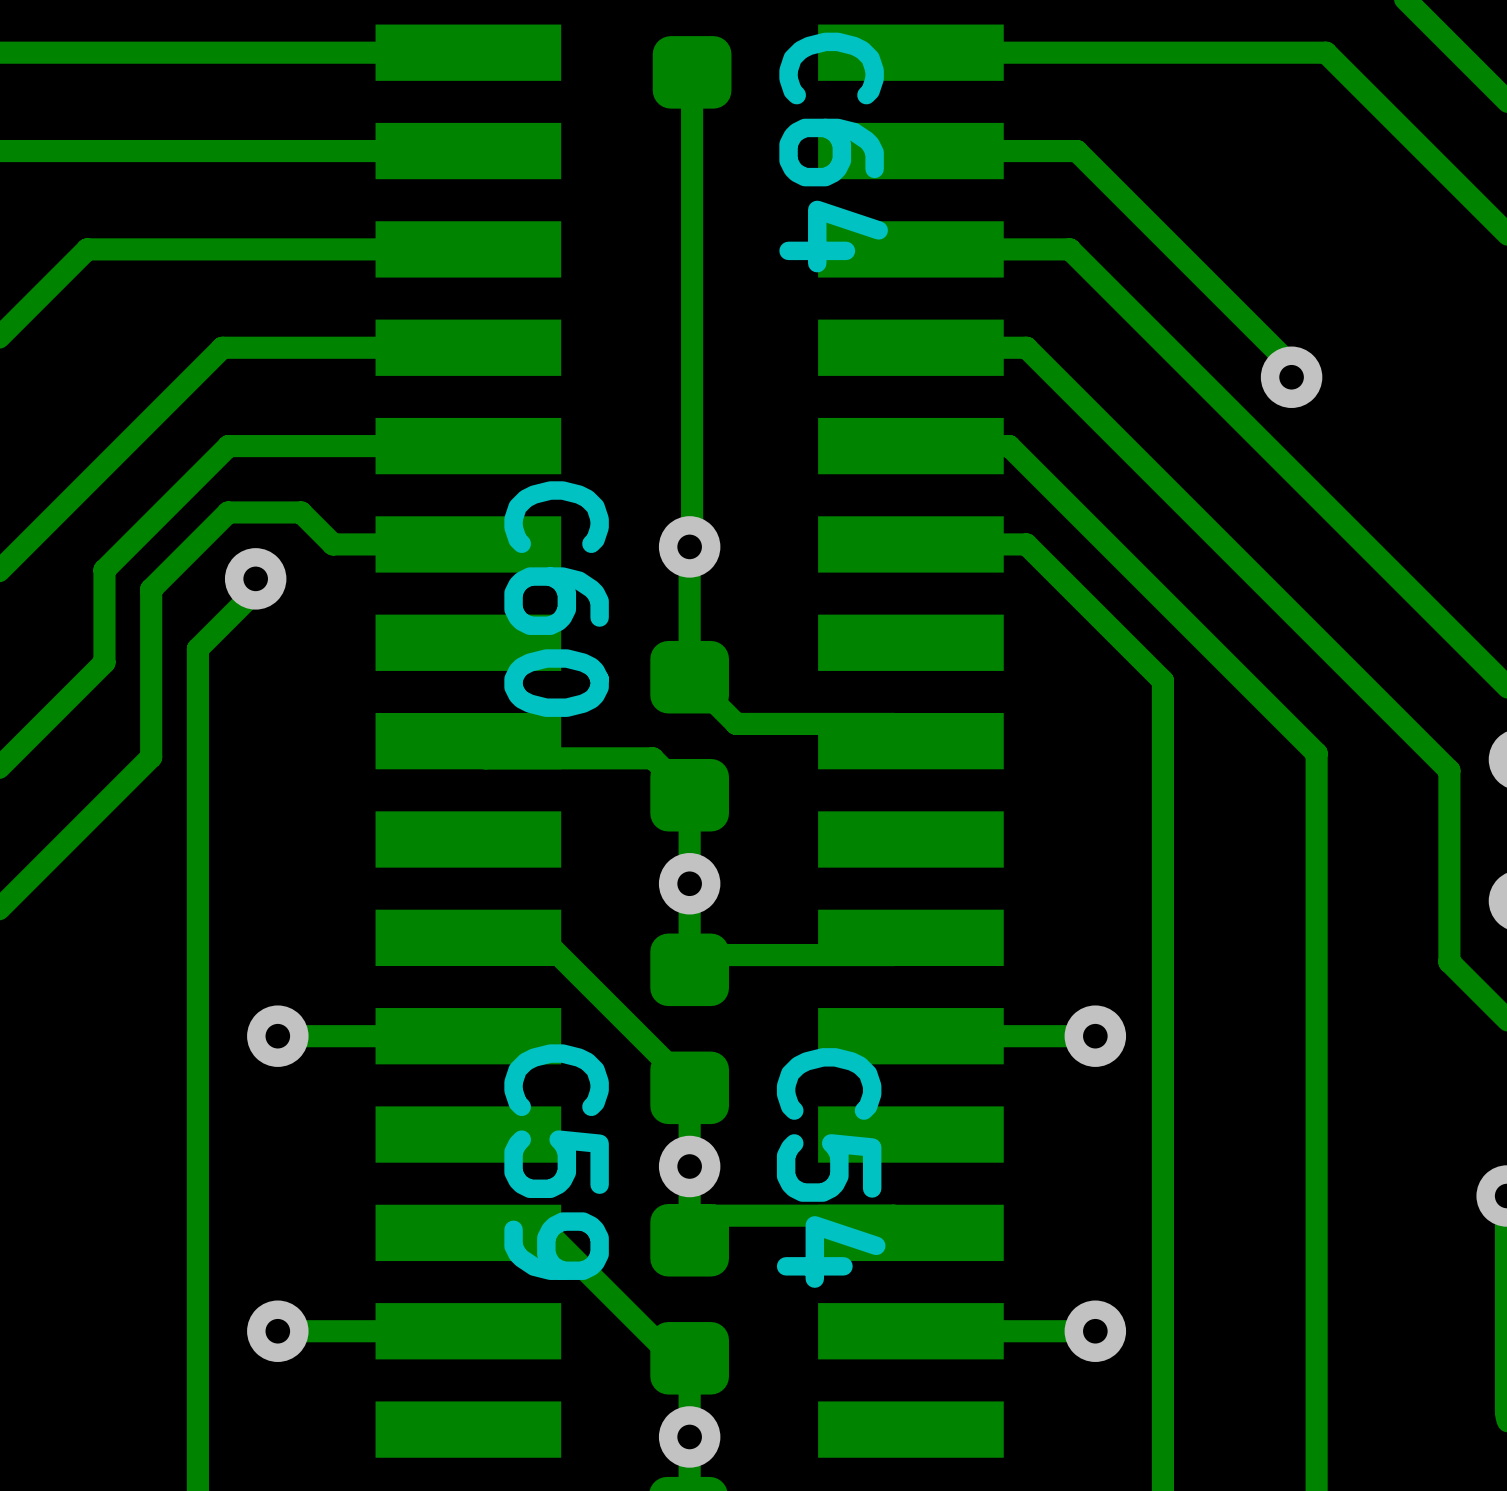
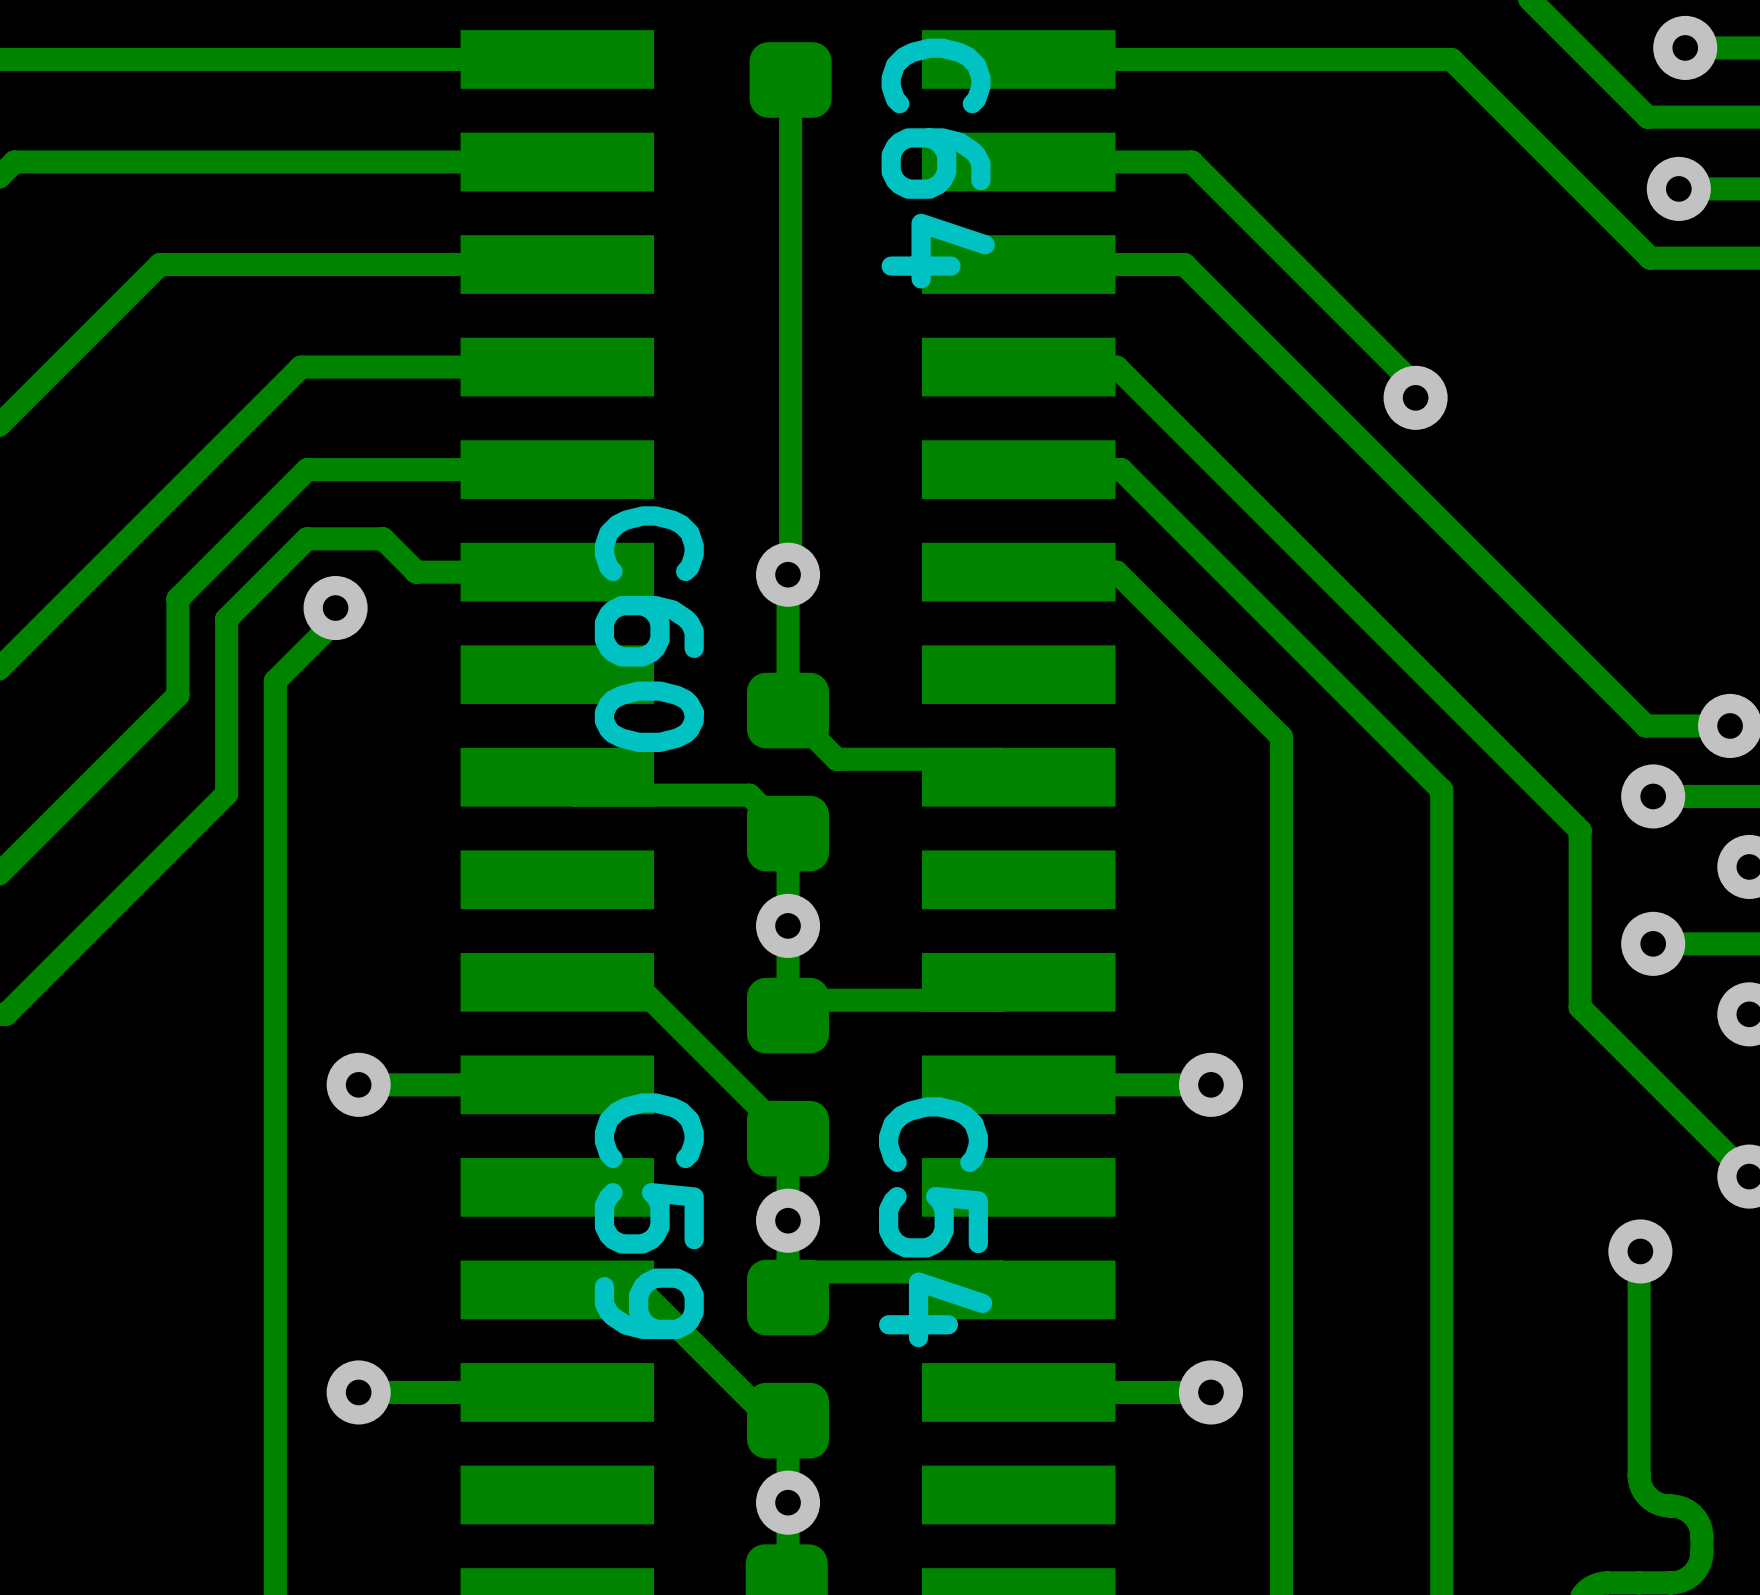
track: (1004, 347) (1026, 347) (1449, 770) (1449, 792) -> (1116, 367) (1580, 830)
track: (1004, 544) (1026, 544) (1162, 680) (1162, 702) -> (1116, 572) (1281, 736)

